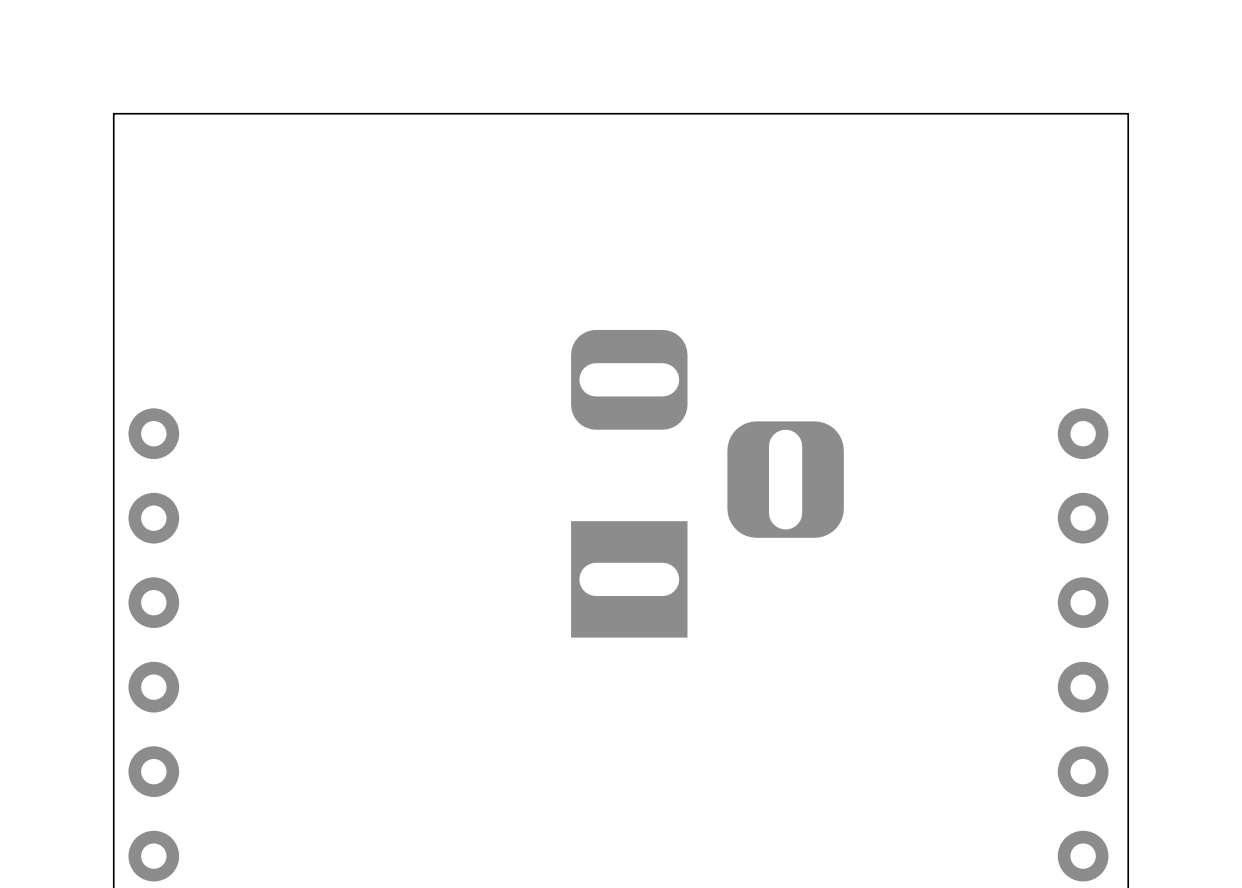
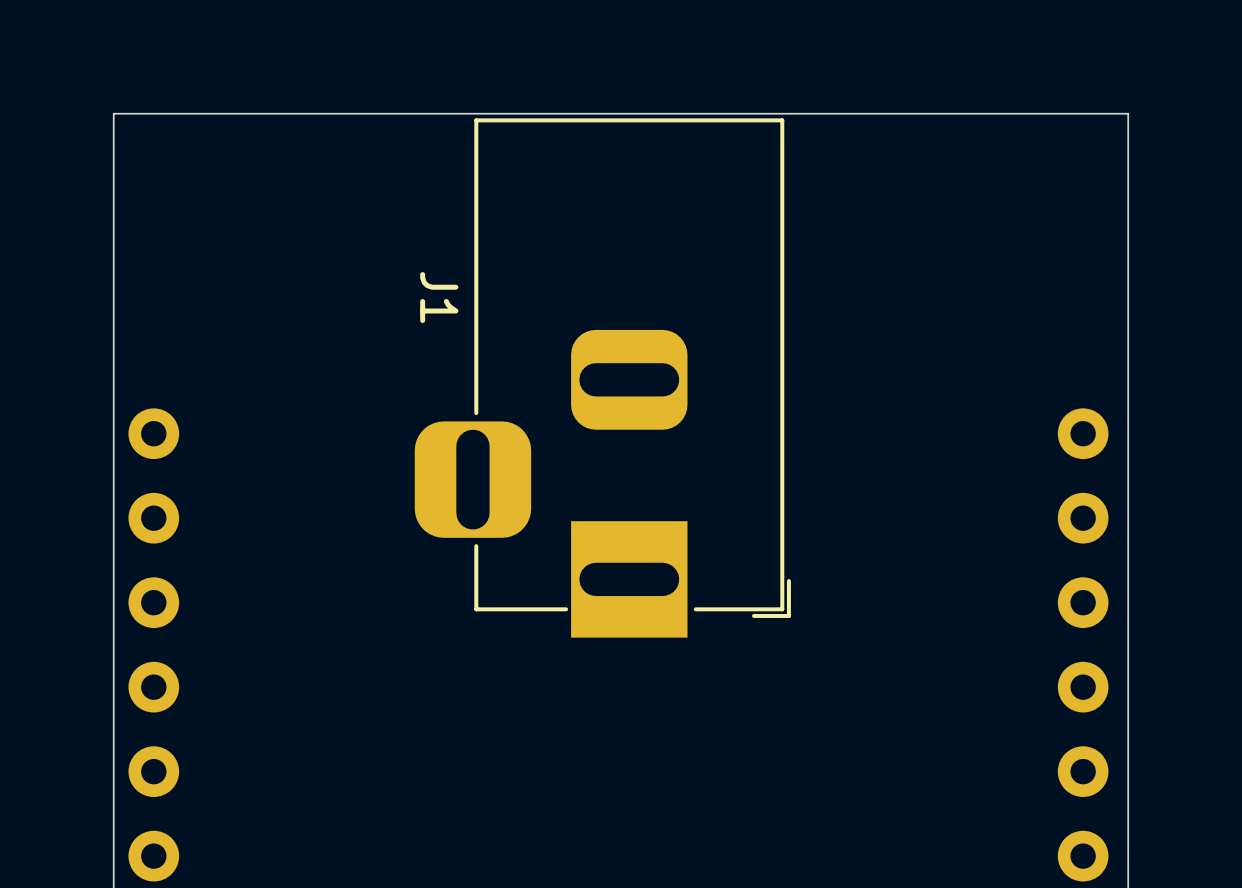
J1 side: top (707, 483) -> bottom (602, 377)

